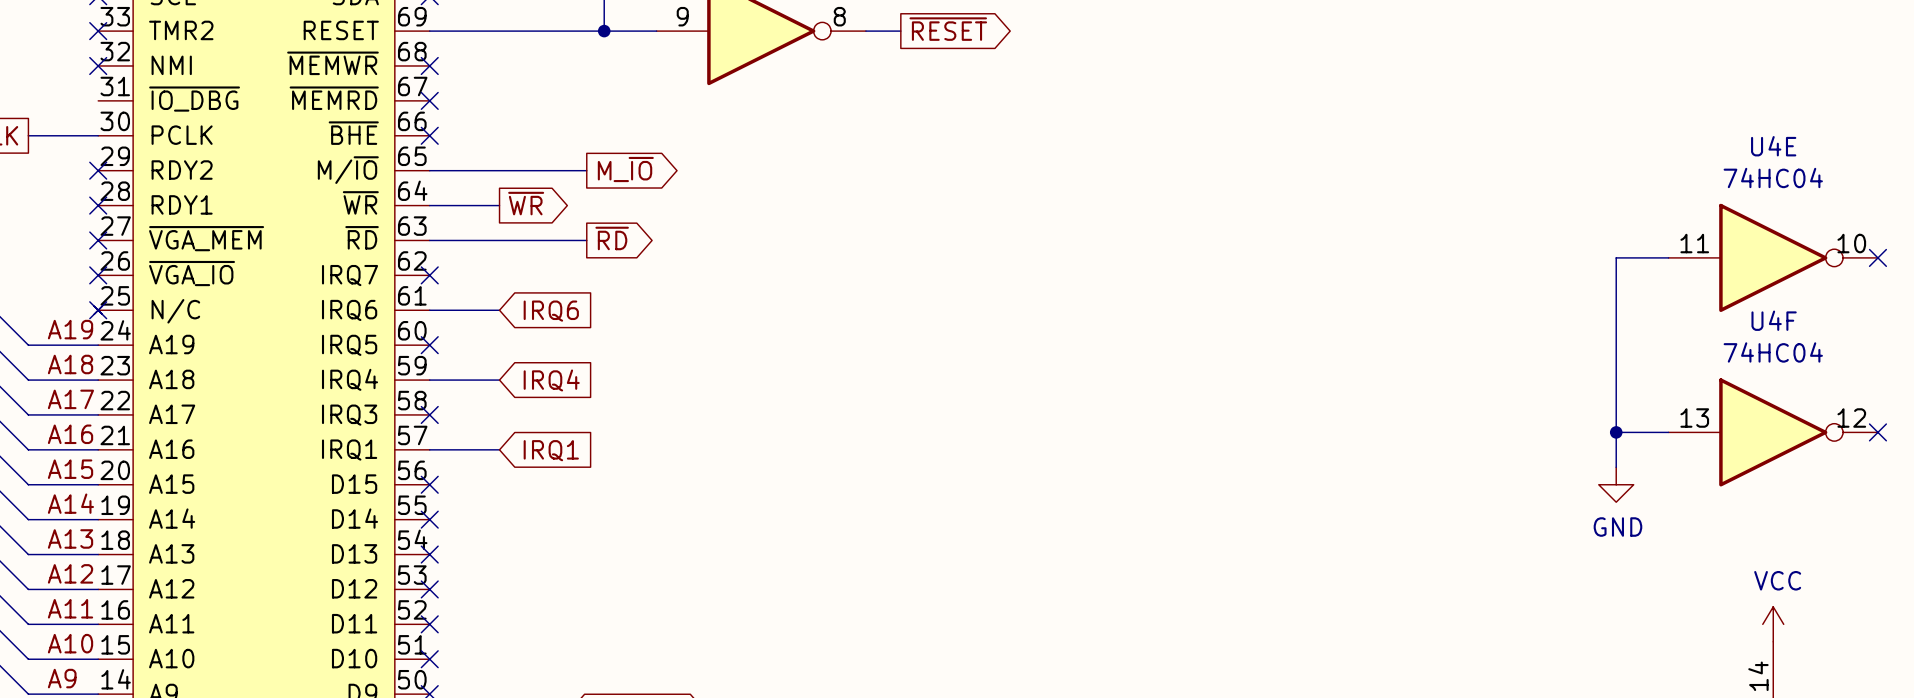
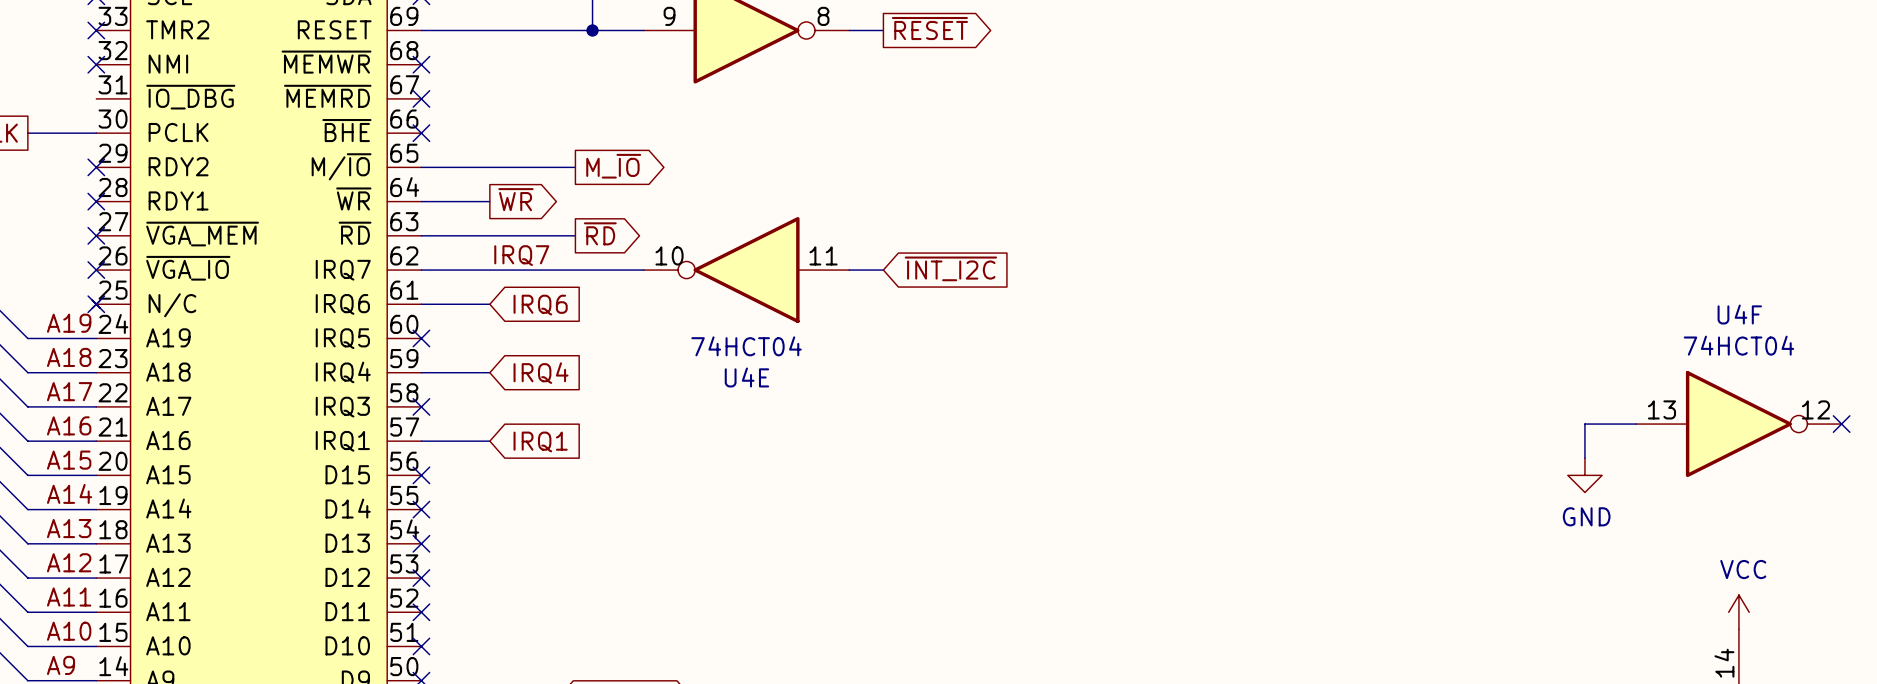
U4E value: 74HC04 (1773, 177) -> 74HCT04 (746, 346)
wire: (1668, 257) (1616, 257) (1616, 432) -> none
U4E rotation: 0° (1773, 257) -> 180° (746, 270)
U4E position: (1773, 257) -> (746, 270)
no-connect mark: (1877, 257) -> none
label: none -> IRQ7 (521, 255)
global label: none -> ~{INT_I2C} (950, 268)
wire: none -> (421, 270) (643, 270)
no-connect mark: (429, 275) -> none
wire: none -> (849, 270) (883, 270)
U4F value: 74HC04 (1773, 352) -> 74HCT04 (1738, 345)
junction: (1616, 432) -> none

